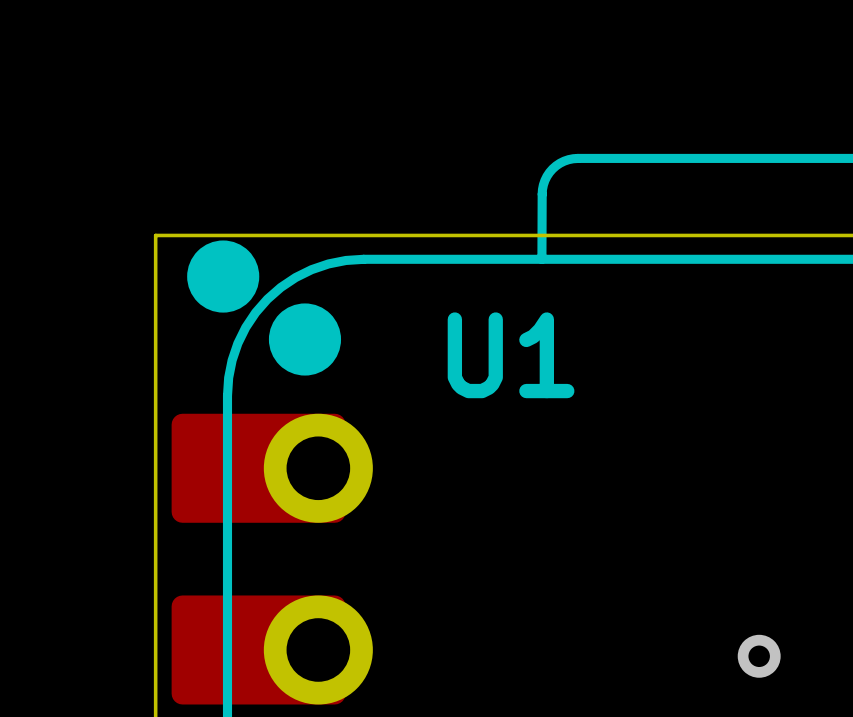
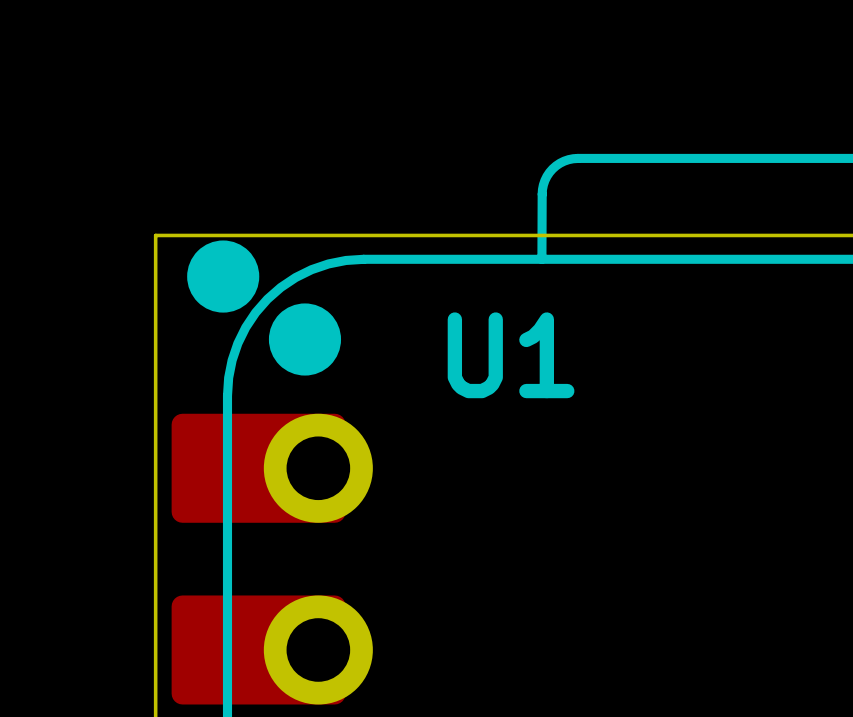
via: (759, 656) -> none

